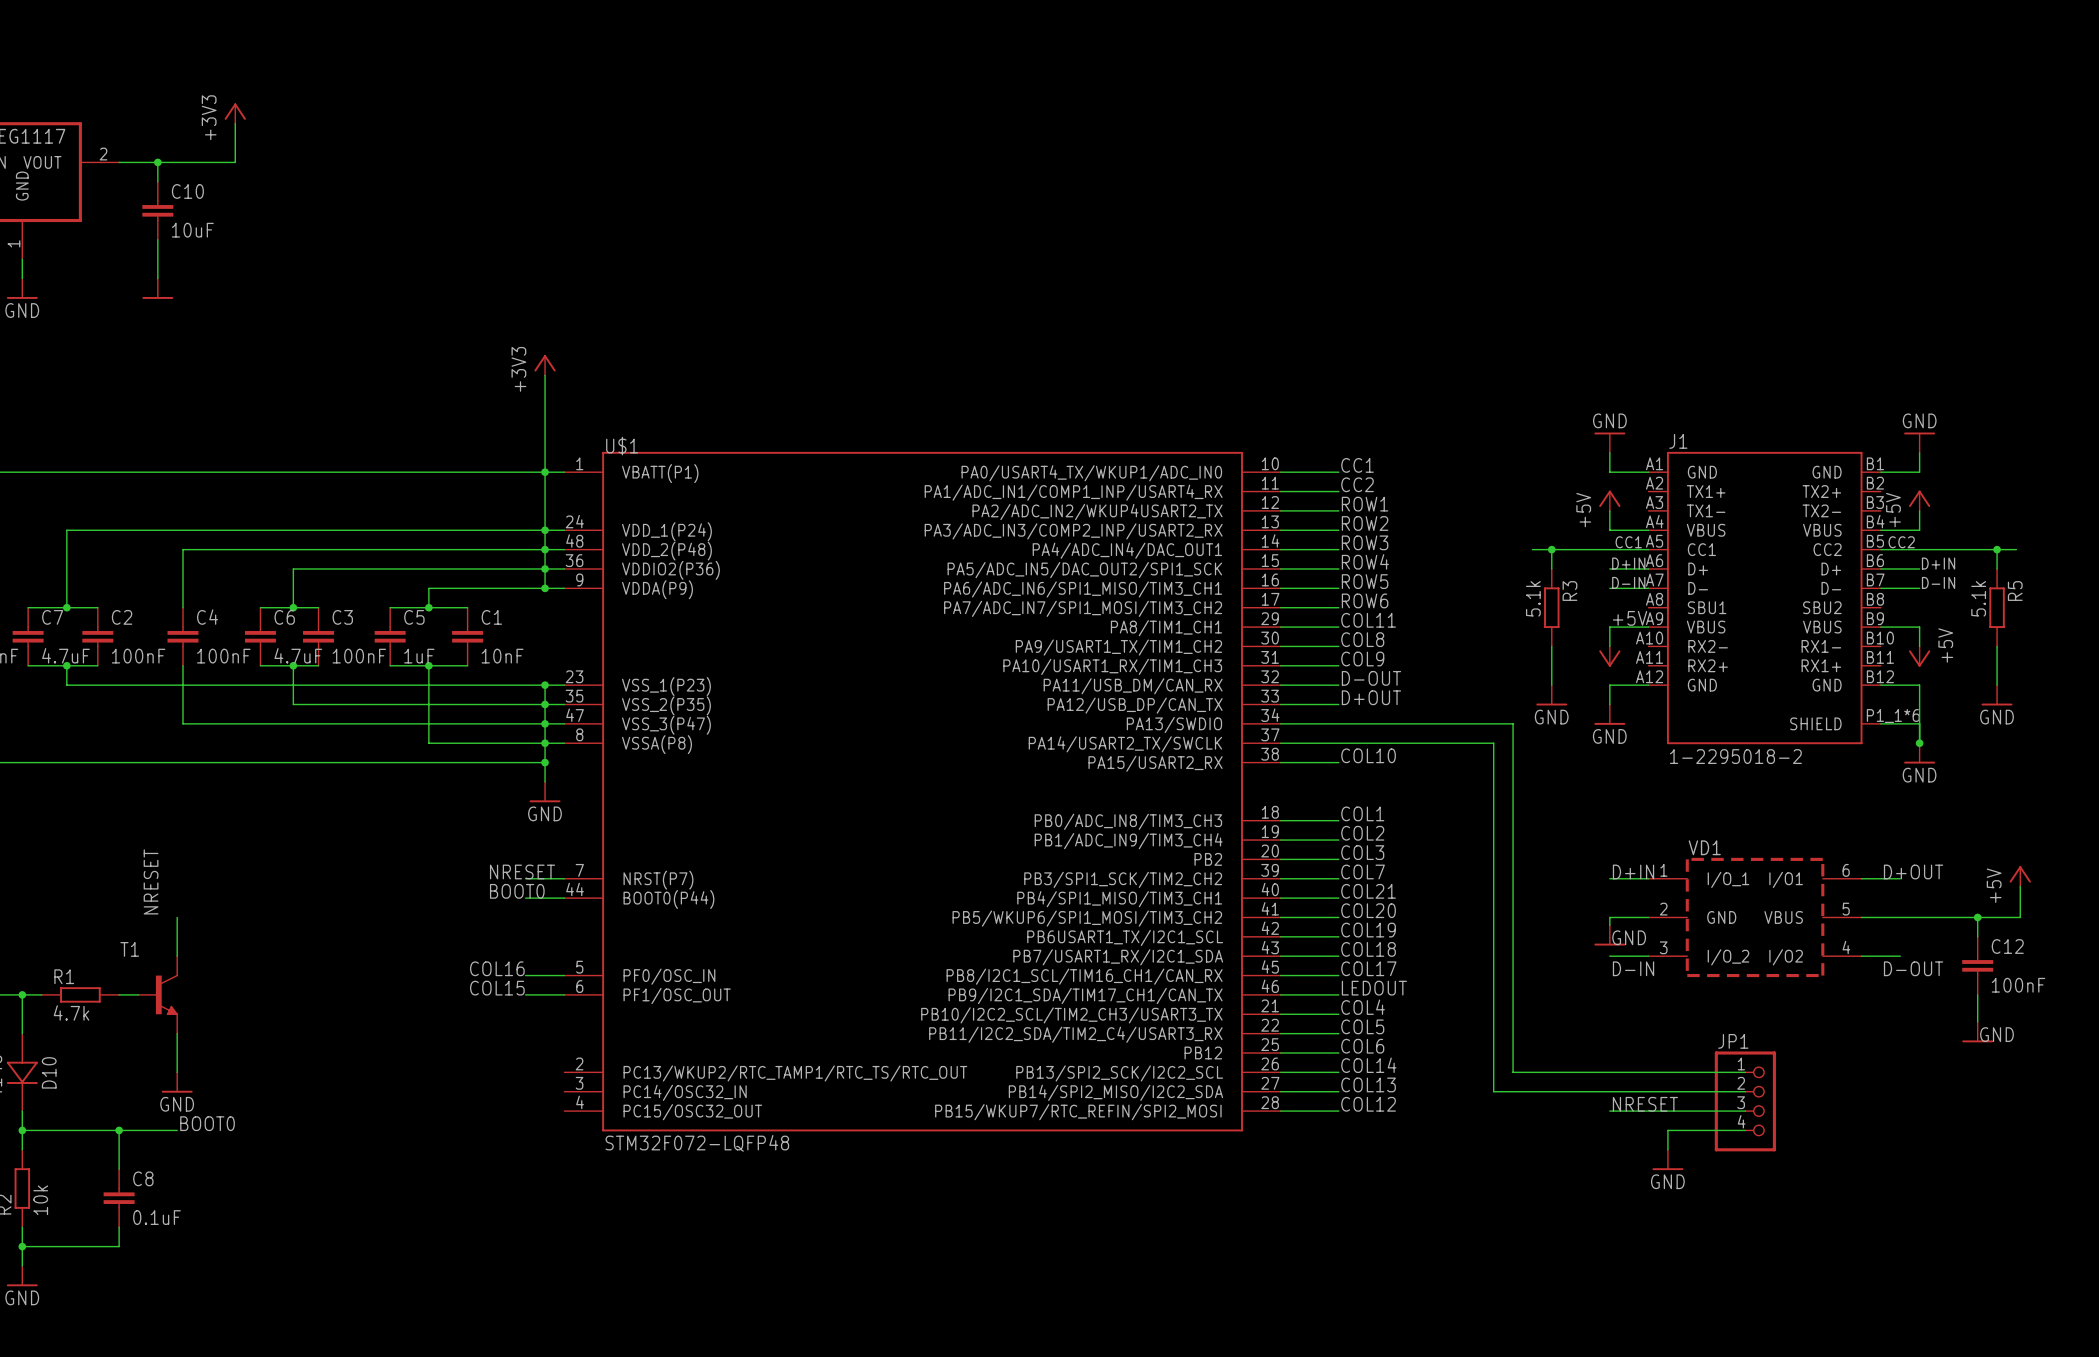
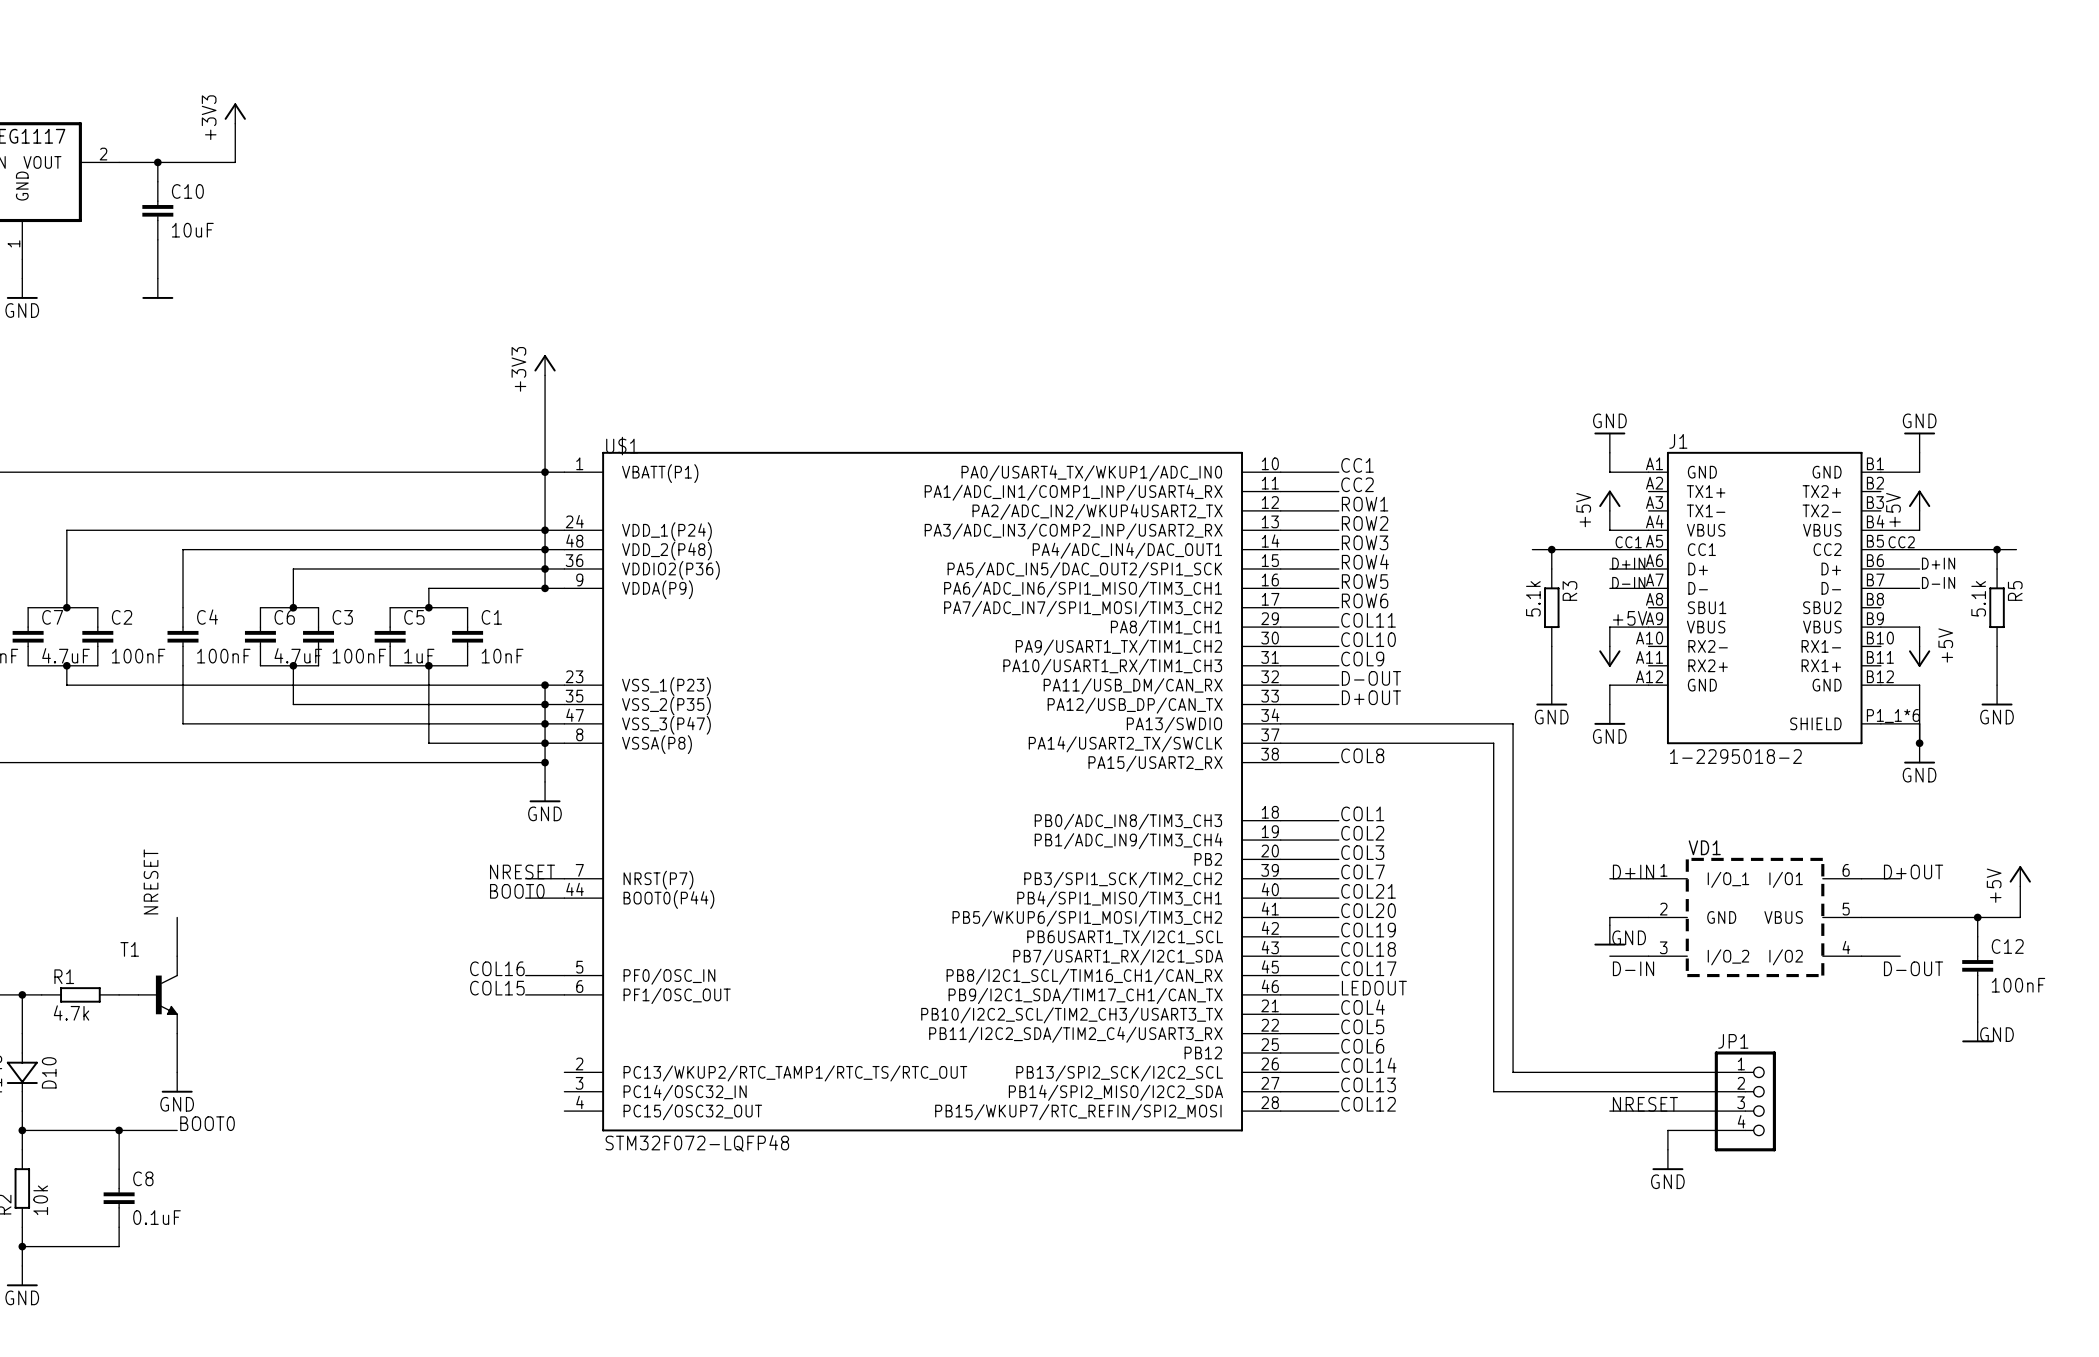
label: COL8 (1362, 639) -> COL10 (1368, 639)
label: COL10 (1368, 755) -> COL8 (1362, 755)

